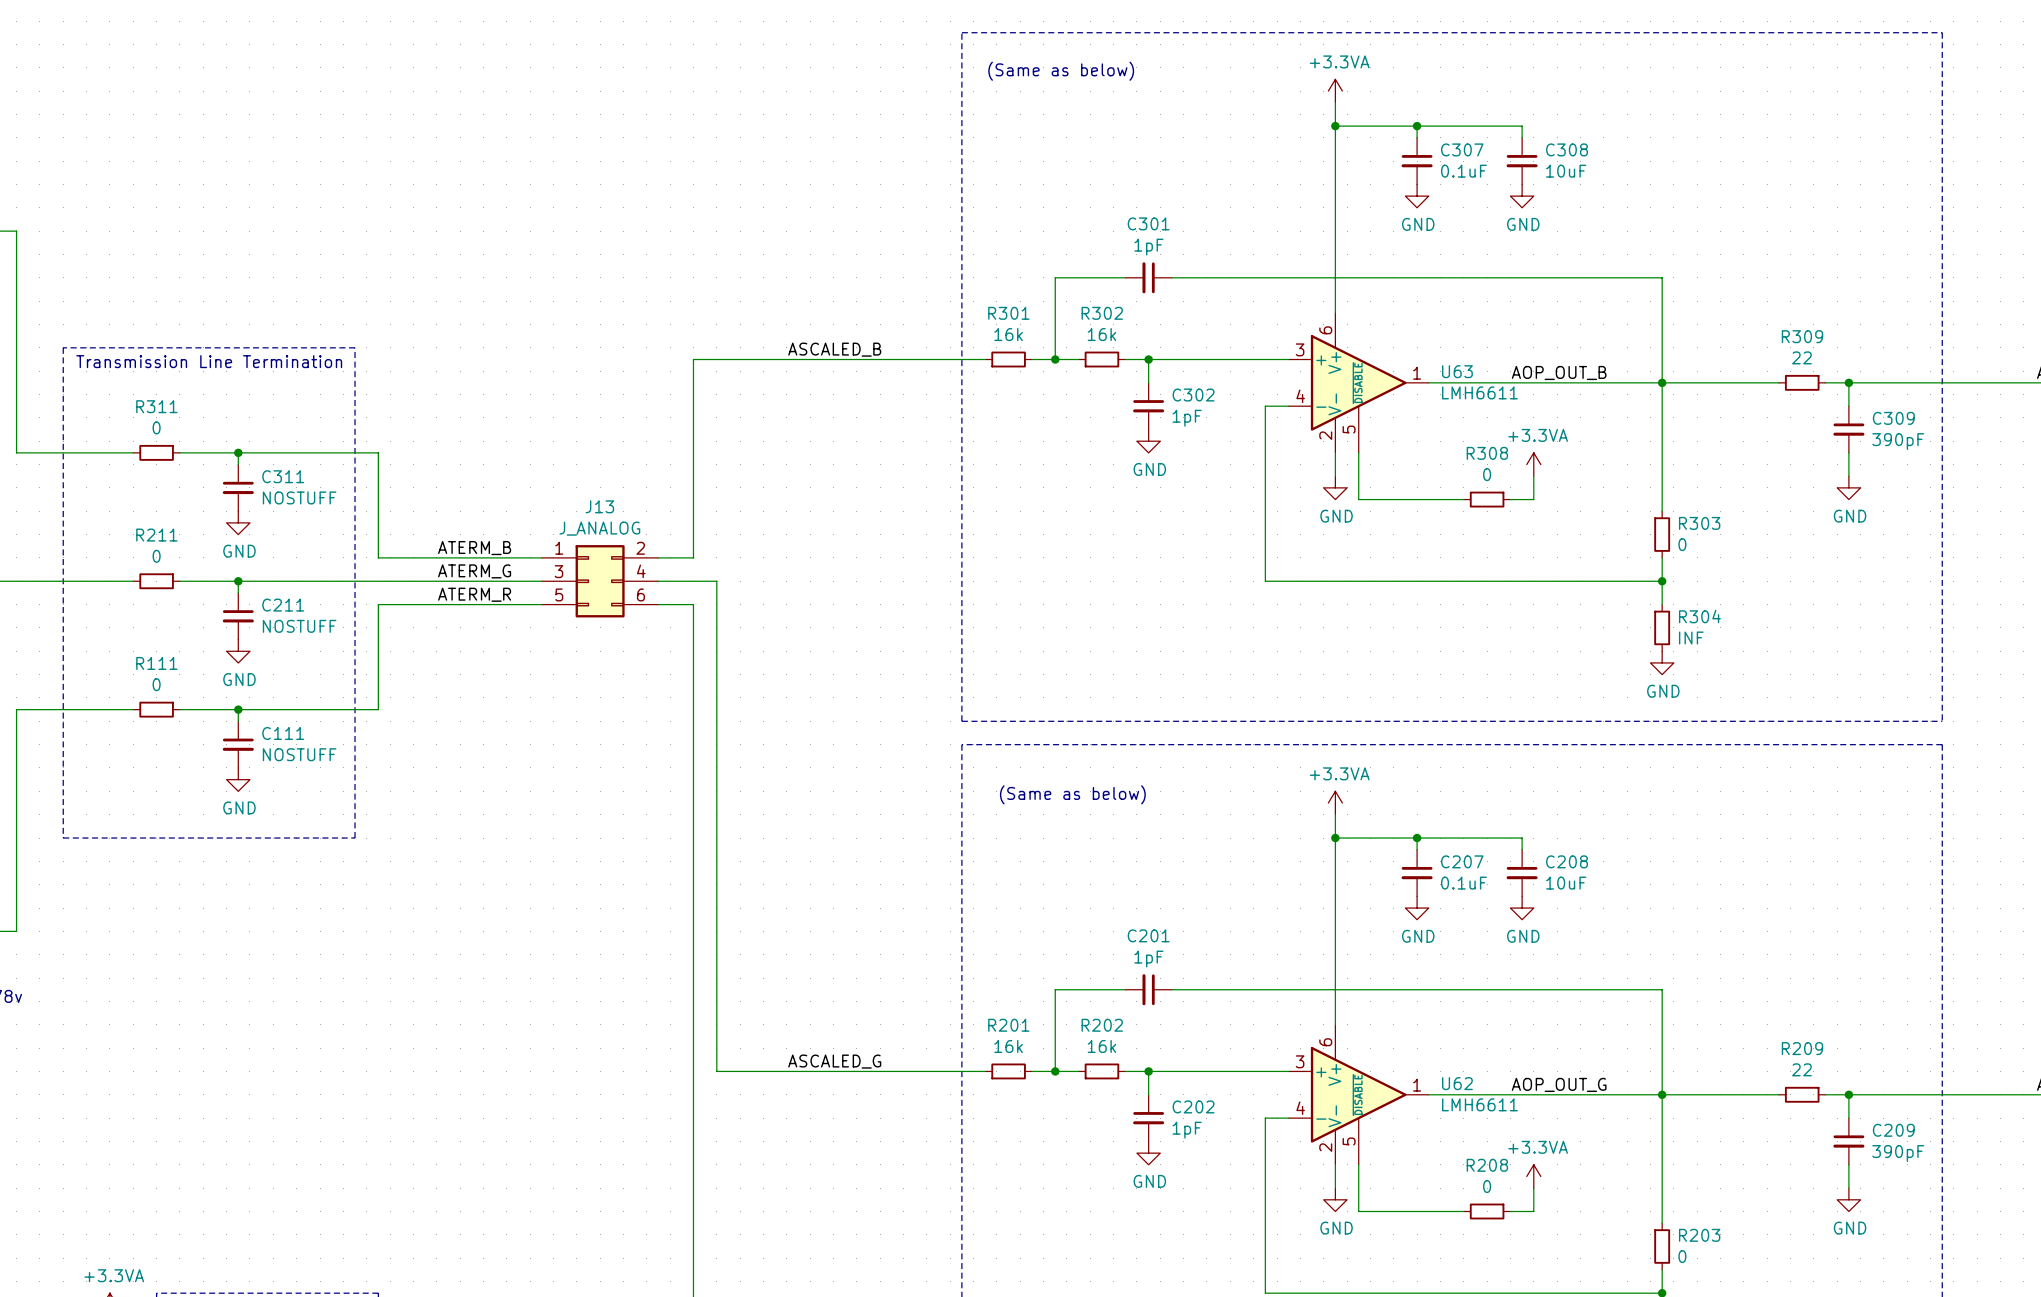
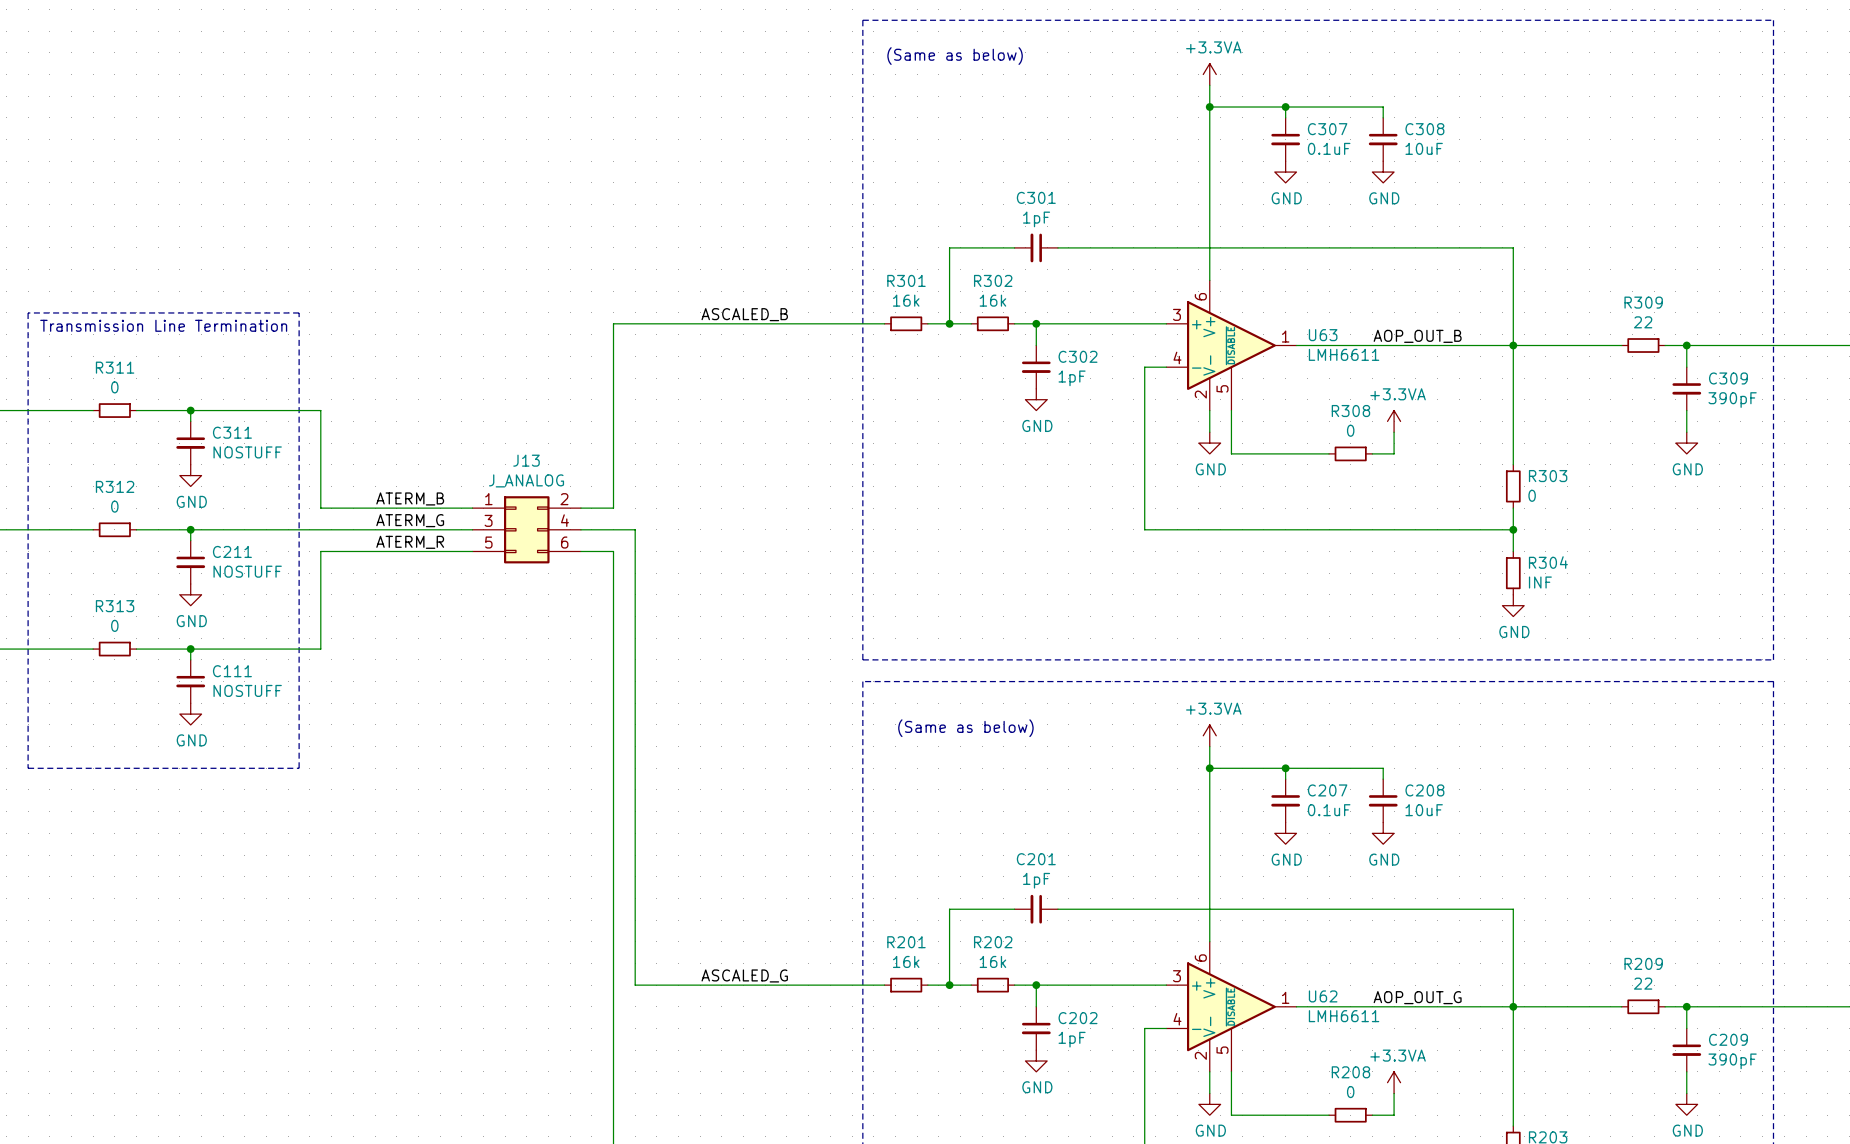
R211 name: R211 (156, 535) -> R312 (115, 486)
R111 name: R111 (156, 663) -> R313 (115, 606)

